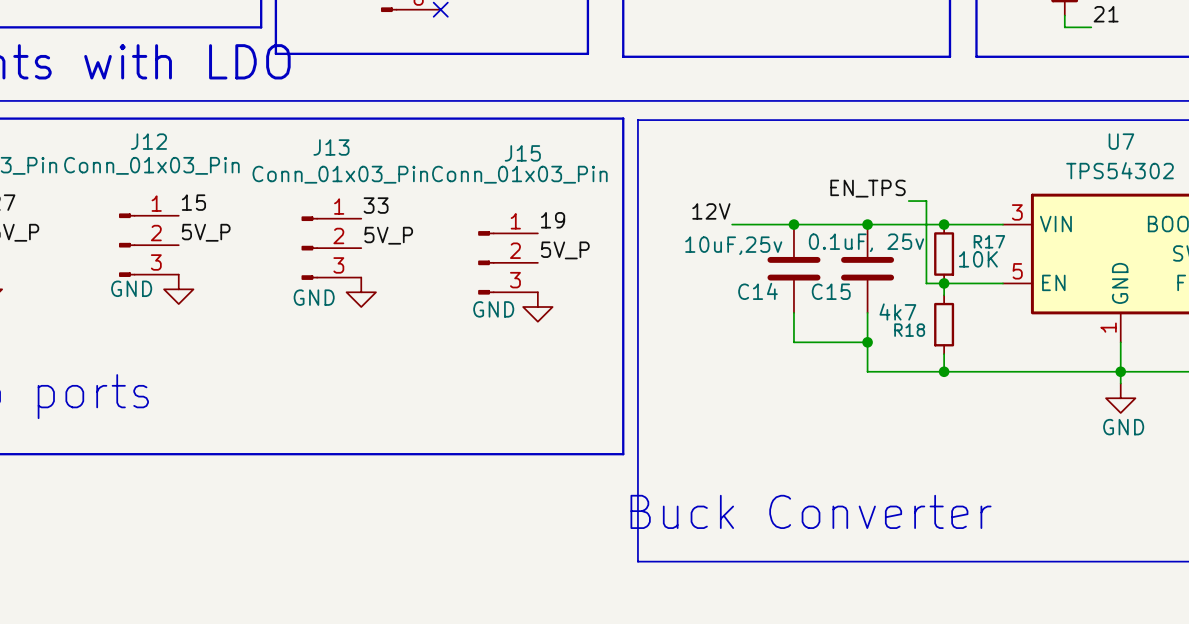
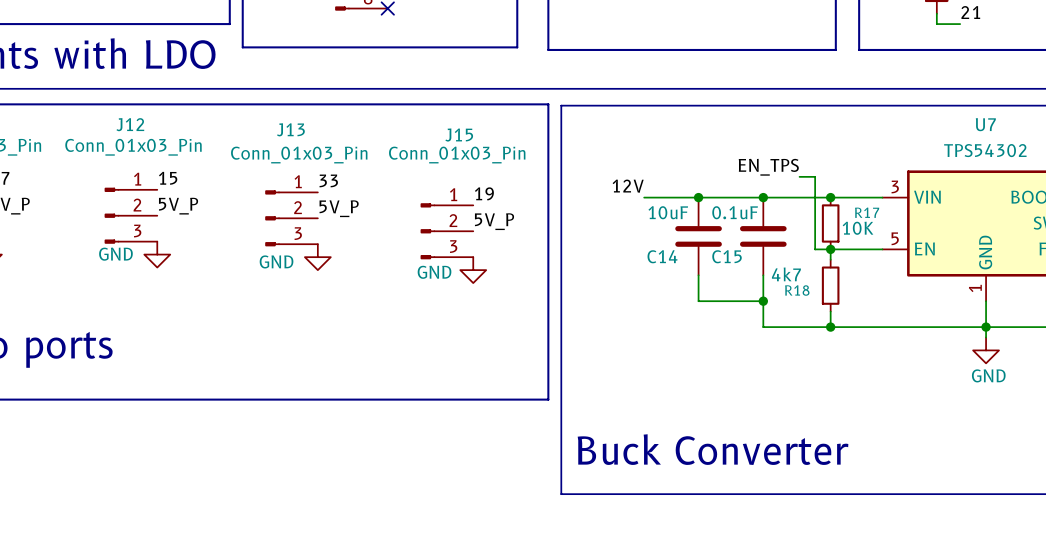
C15 value: 0.1uF, 25v (866, 242) -> 0.1uF (735, 212)
C14 value: 10uF,25v (733, 245) -> 10uF (668, 212)

